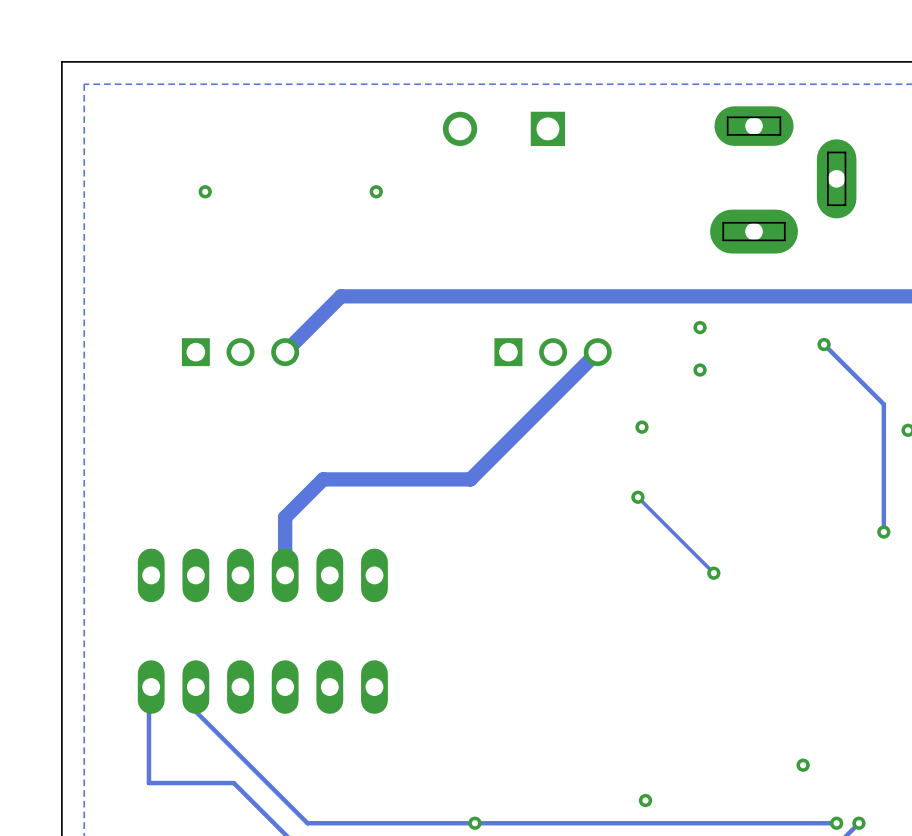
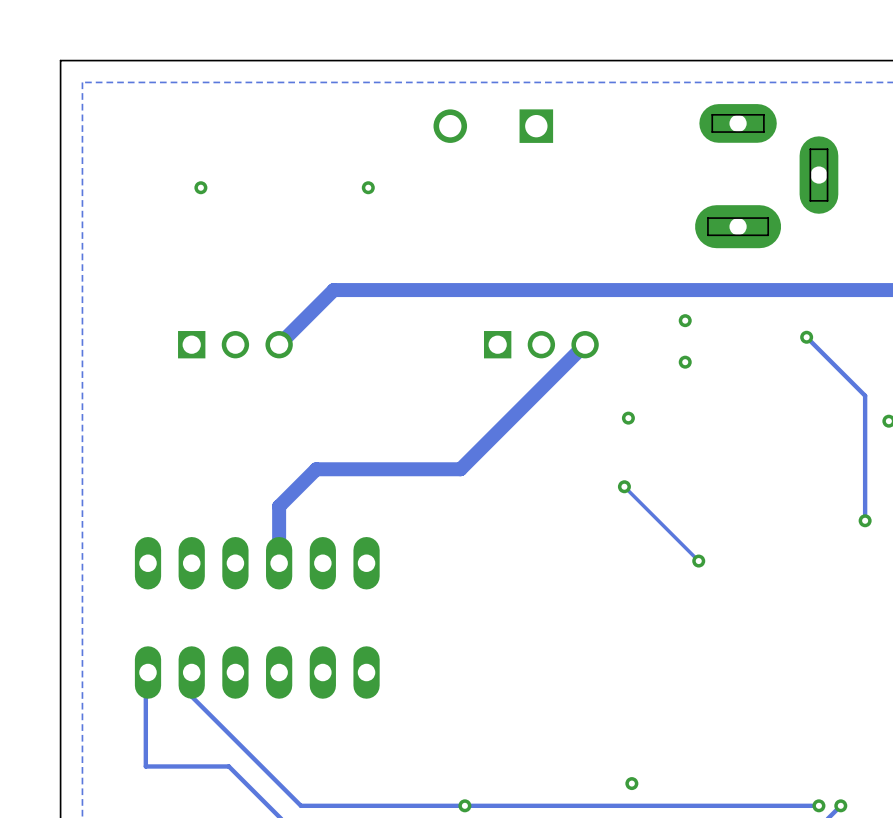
via: (803, 765) -> none

